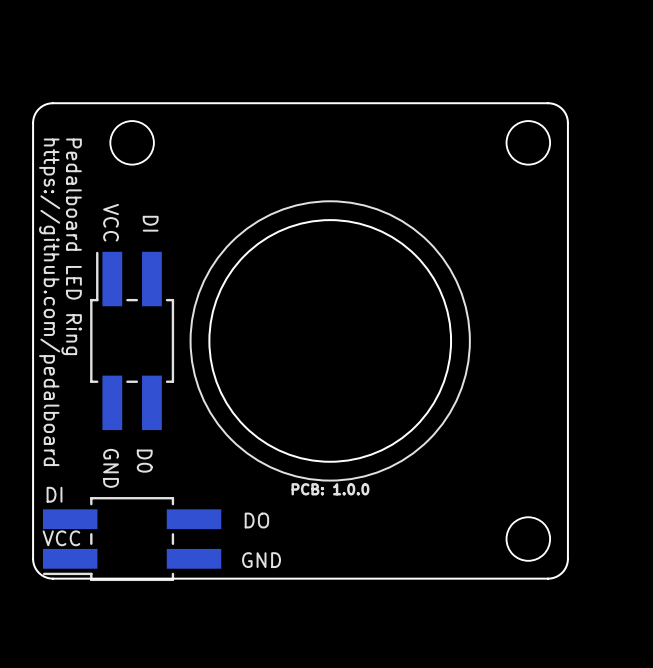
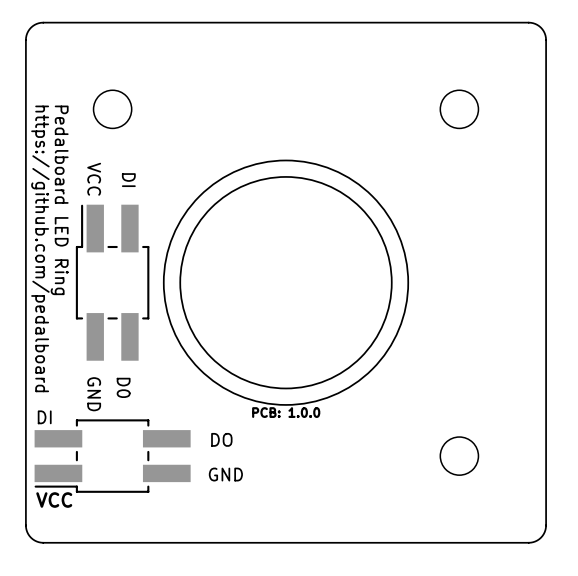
board edge: (33, 123) (38, 109) (52, 103) (548, 103) (562, 109) (567, 123) (567, 558) (565, 567) (560, 574) (548, 578) (52, 578) (38, 572) (33, 558) -> (25, 91) (26, 35) (31, 27) (41, 22) (528, 22) (540, 27) (545, 37) (546, 525) (543, 534) (539, 539) (528, 542) (41, 542) (31, 537) (26, 529) (25, 473)
text position: VCC (61, 538) -> VCC (54, 500)

